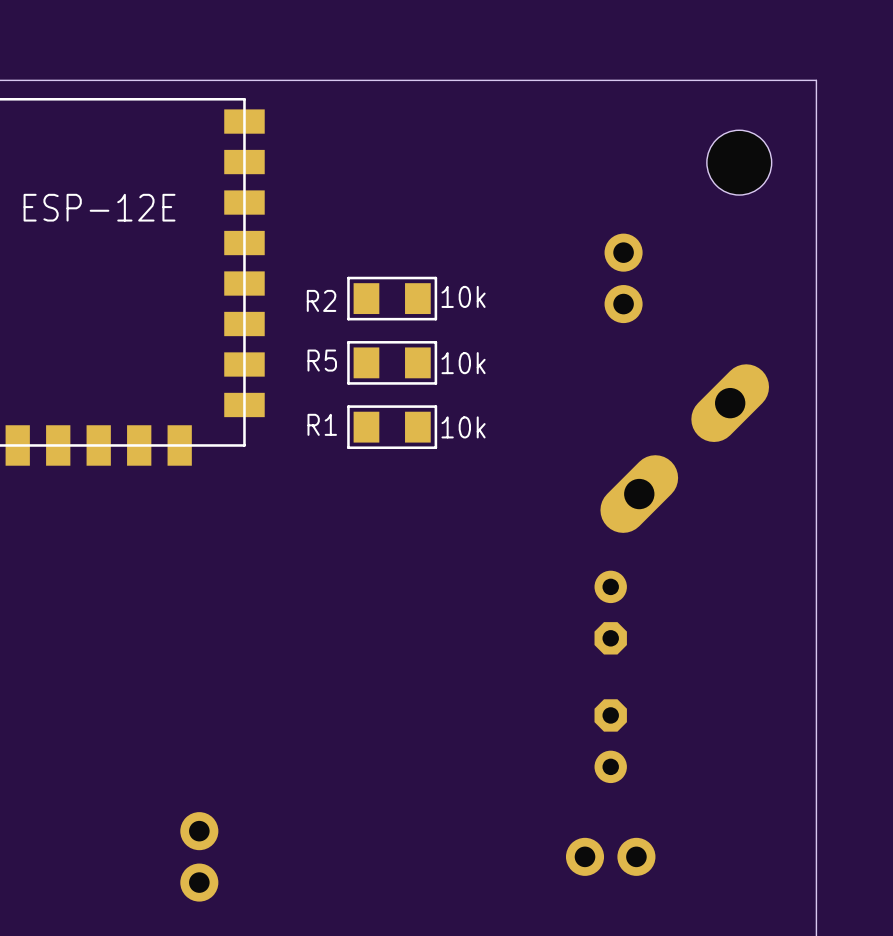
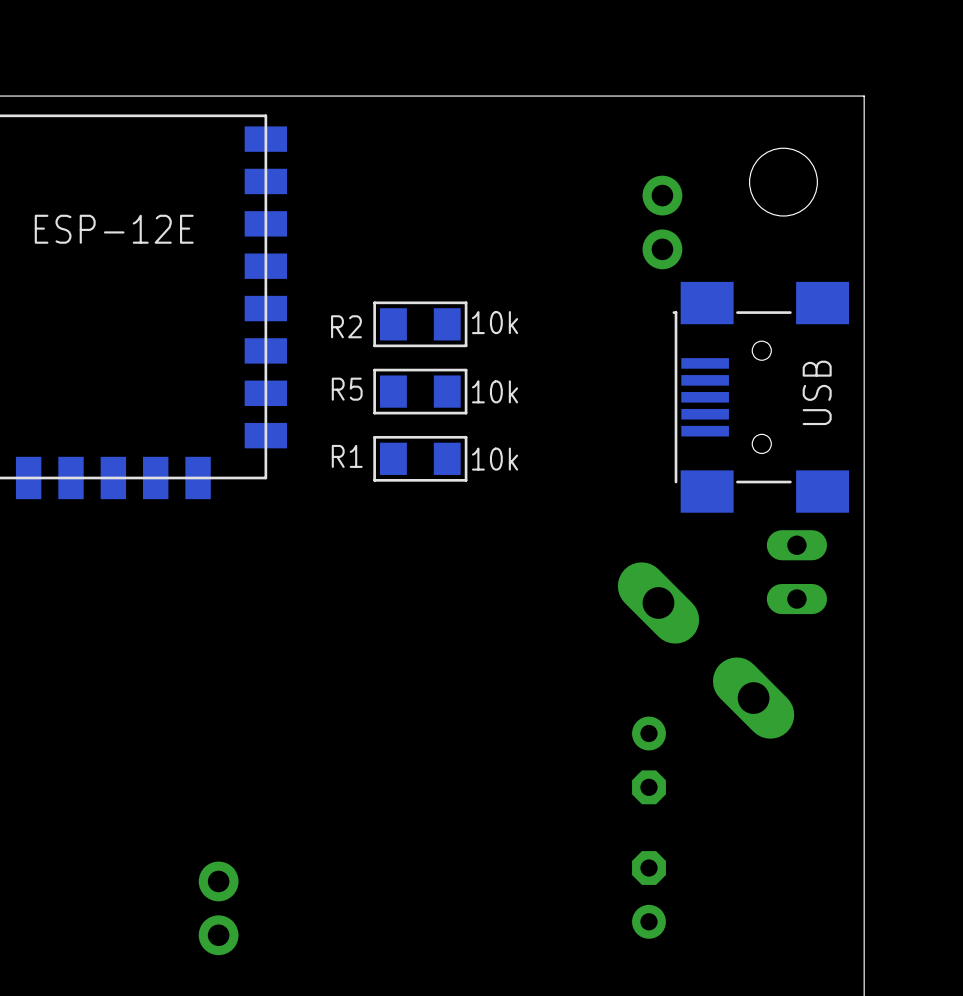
part position: (623, 278) -> (662, 222)
part: none -> (760, 397)
part rotation: 0° (684, 448) -> 90° clockwise (706, 650)
part position: (684, 448) -> (706, 650)
part: none -> (796, 572)
part: (610, 612) -> none
part rotation: 0° (610, 741) -> 180° (648, 760)
part footprint: [565, 837, 656, 876] -> [632, 851, 666, 939]

